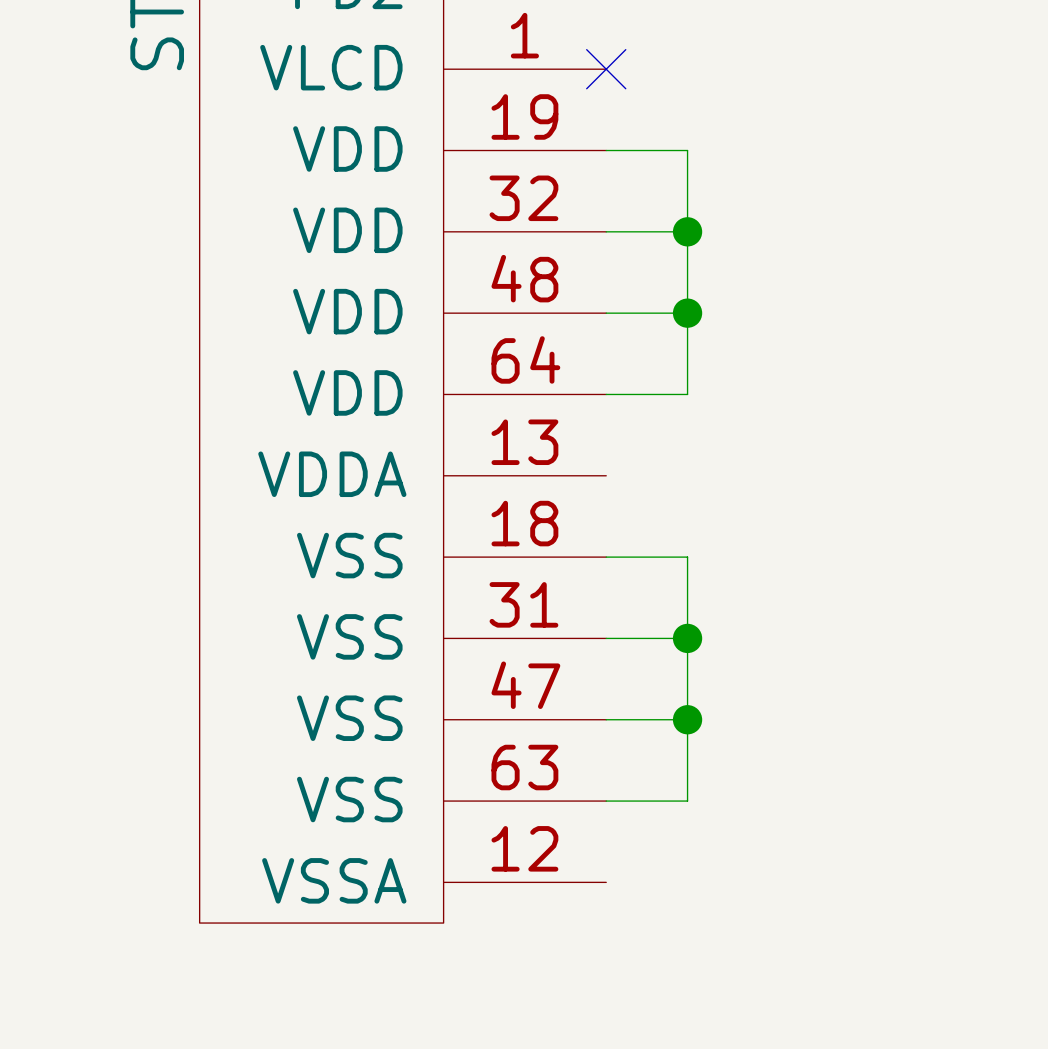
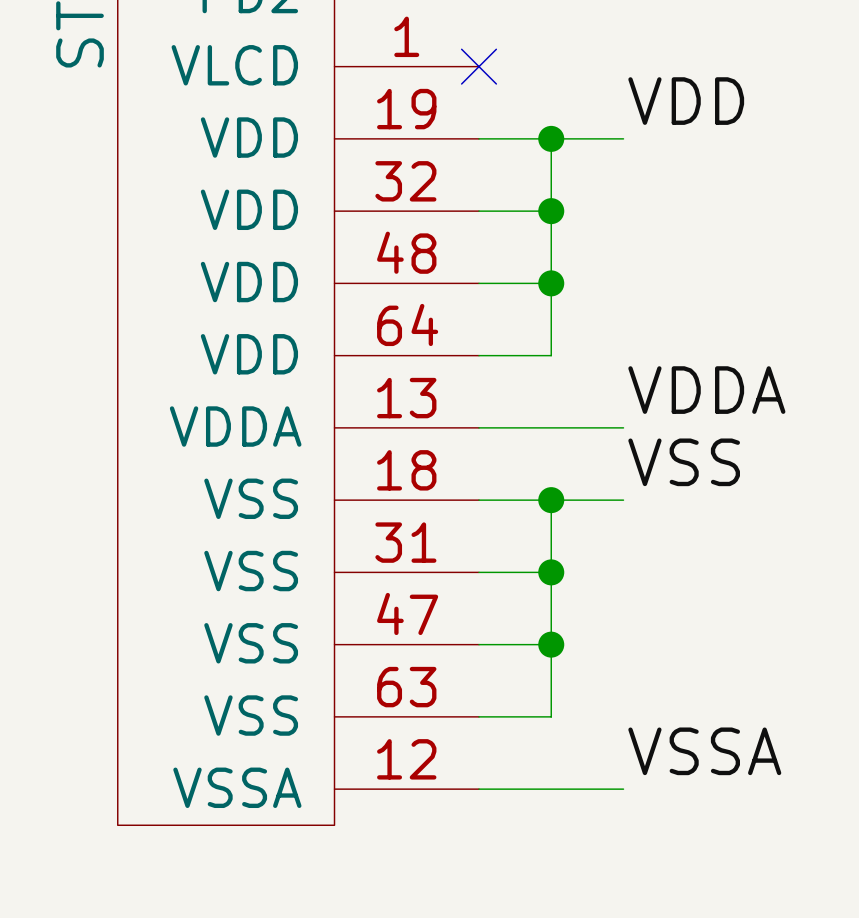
label: none -> VDD (686, 101)
wire: none -> (551, 138) (623, 138)
junction: none -> (551, 138)
label: none -> VDDA (706, 390)
wire: none -> (479, 427) (623, 427)
label: none -> VSS (684, 462)
wire: none -> (551, 500) (623, 500)
junction: none -> (551, 500)
label: none -> VSSA (704, 751)
wire: none -> (479, 789) (623, 789)

